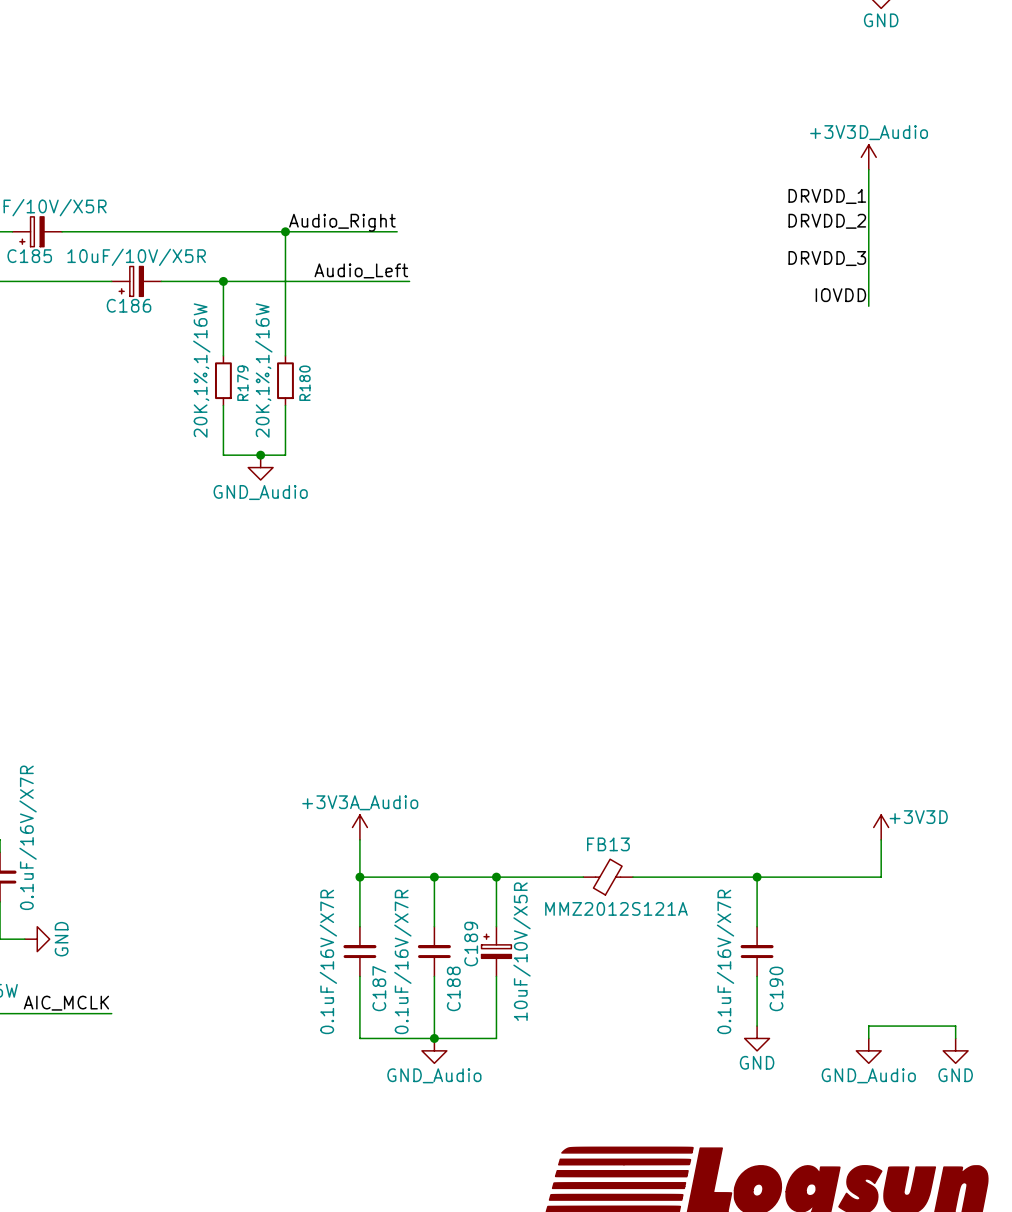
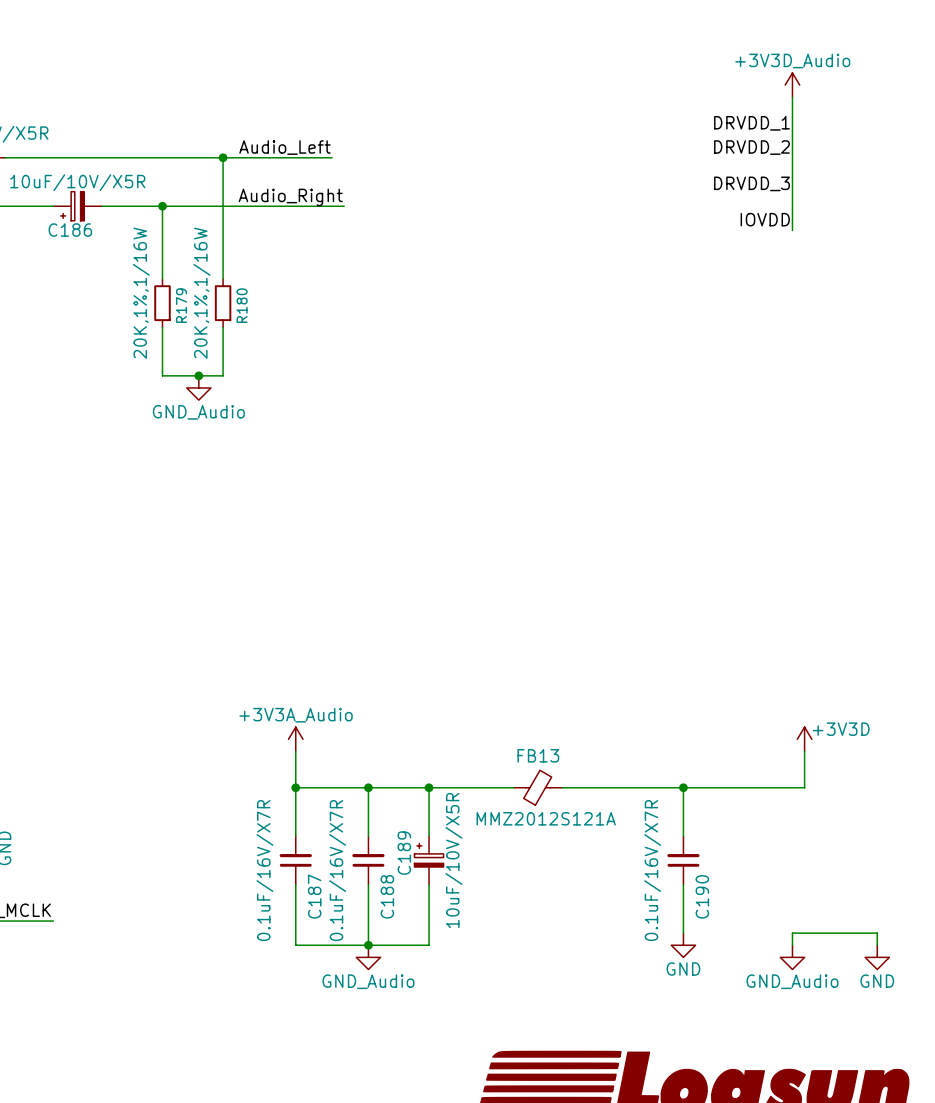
label: Audio_Right (342, 222) -> Audio_Left (284, 147)
label: Audio_Left (361, 270) -> Audio_Right (290, 197)

